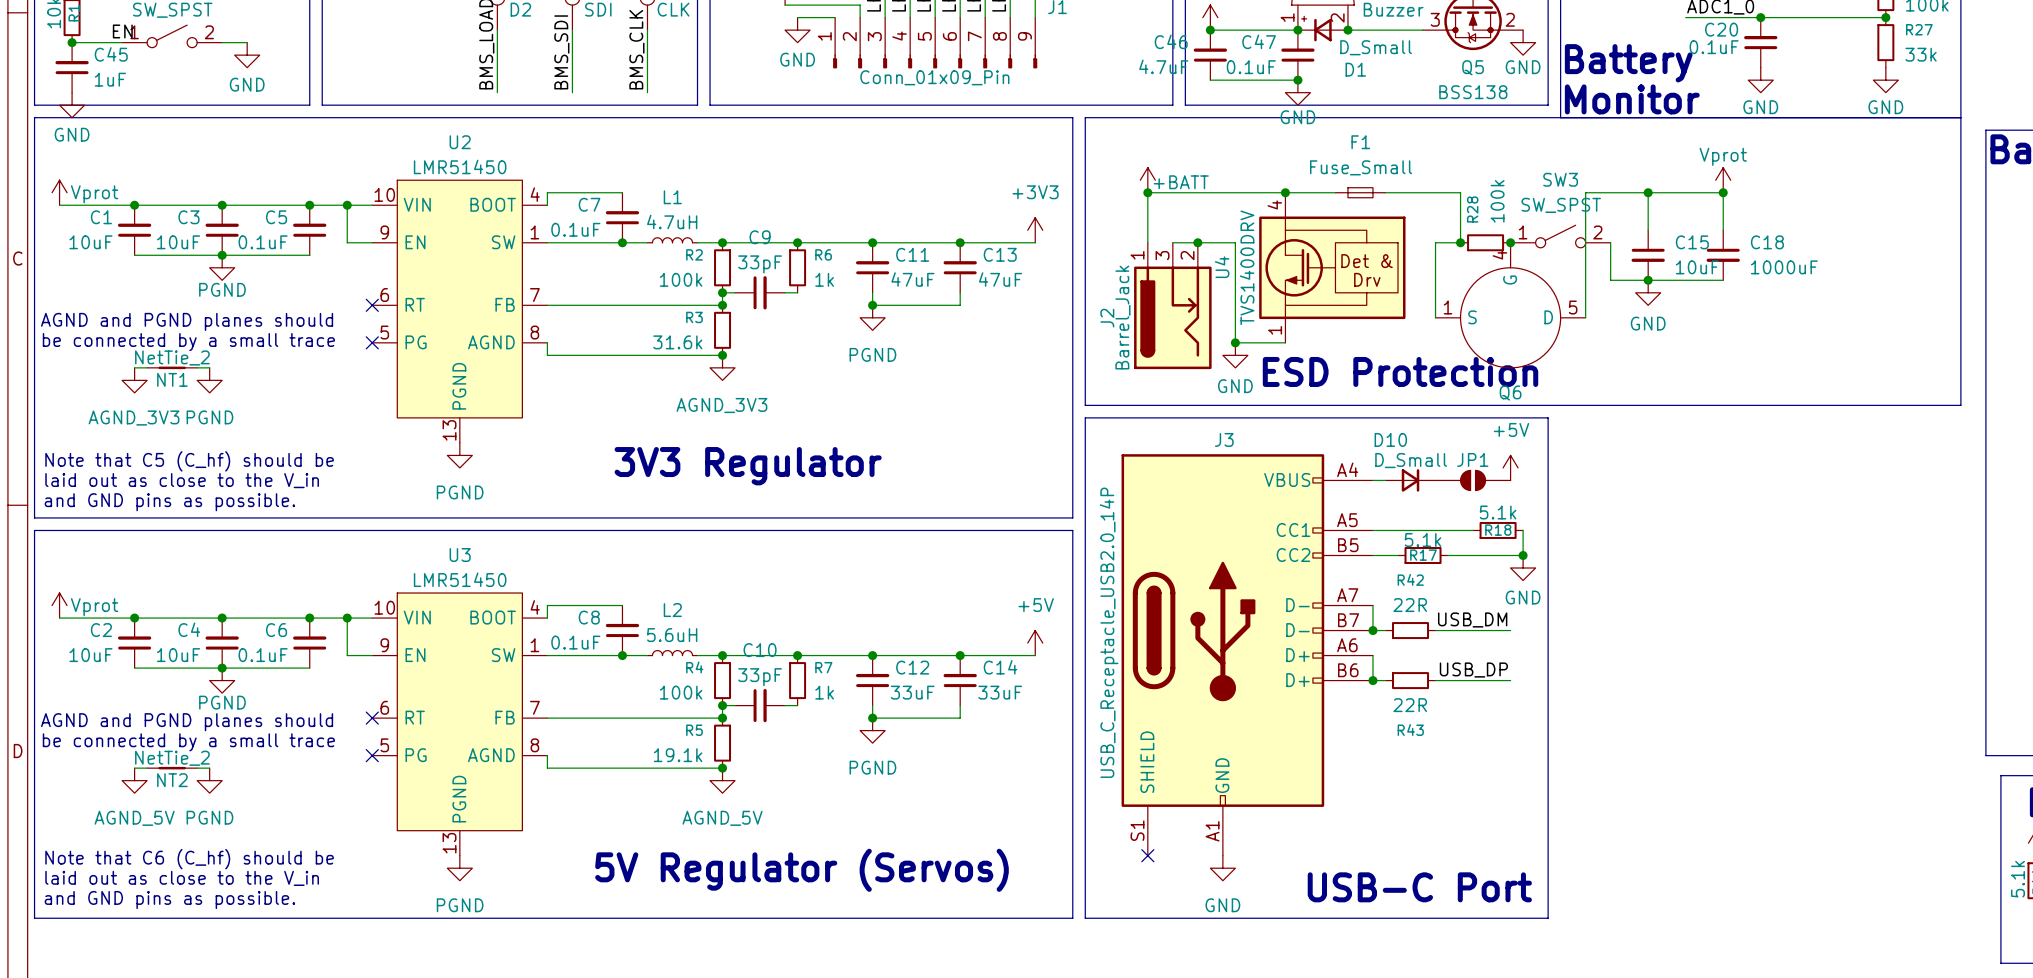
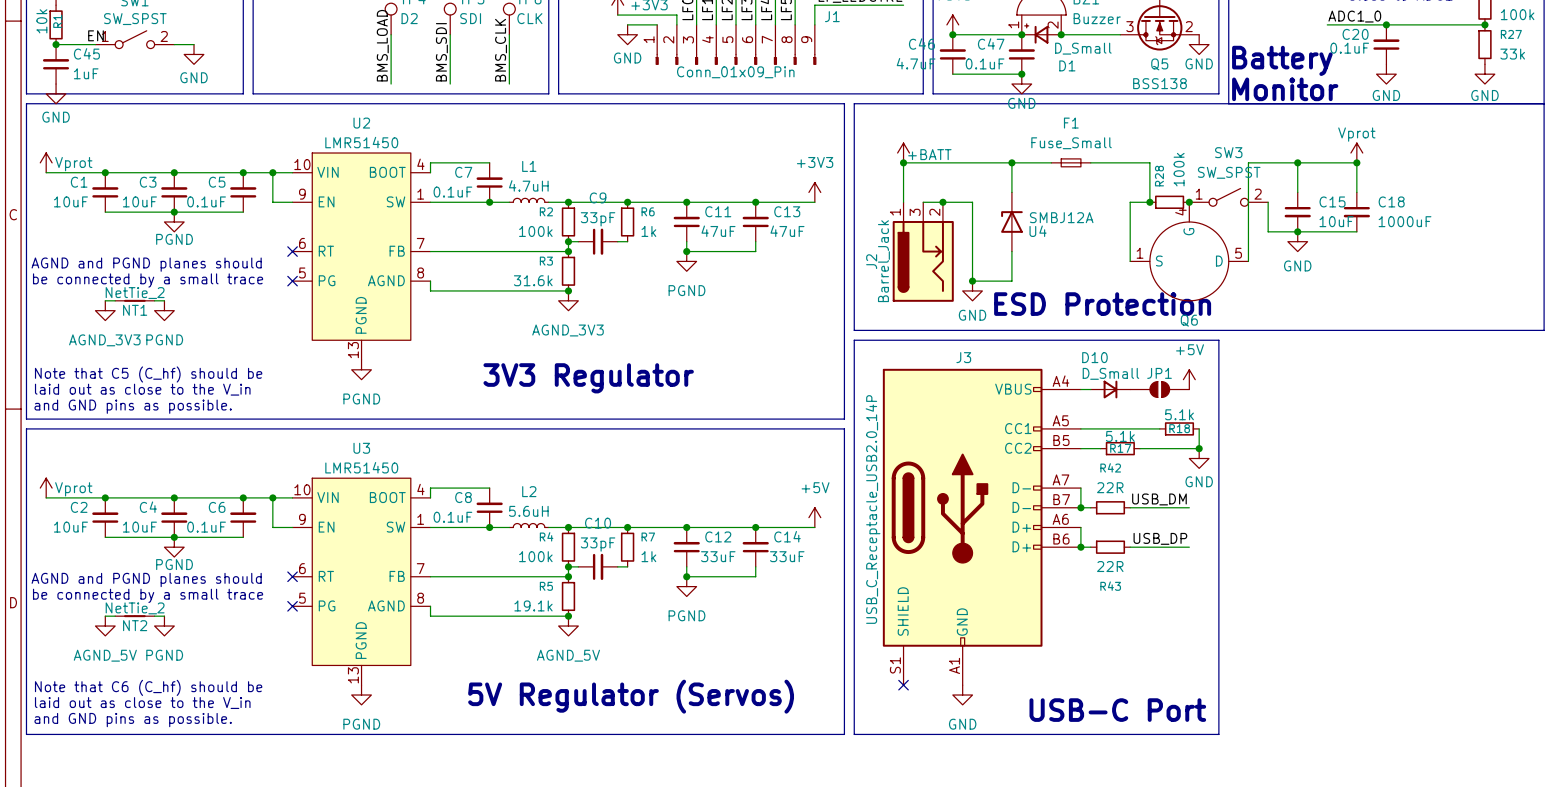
U4 symbol: [1259, 192, 1406, 343] -> [1001, 192, 1023, 252]
U4 name position: U4 (1222, 267) -> U4 (1038, 231)
U4 value: TVS1400DRV (1247, 267) -> SMBJ12A (1061, 217)

